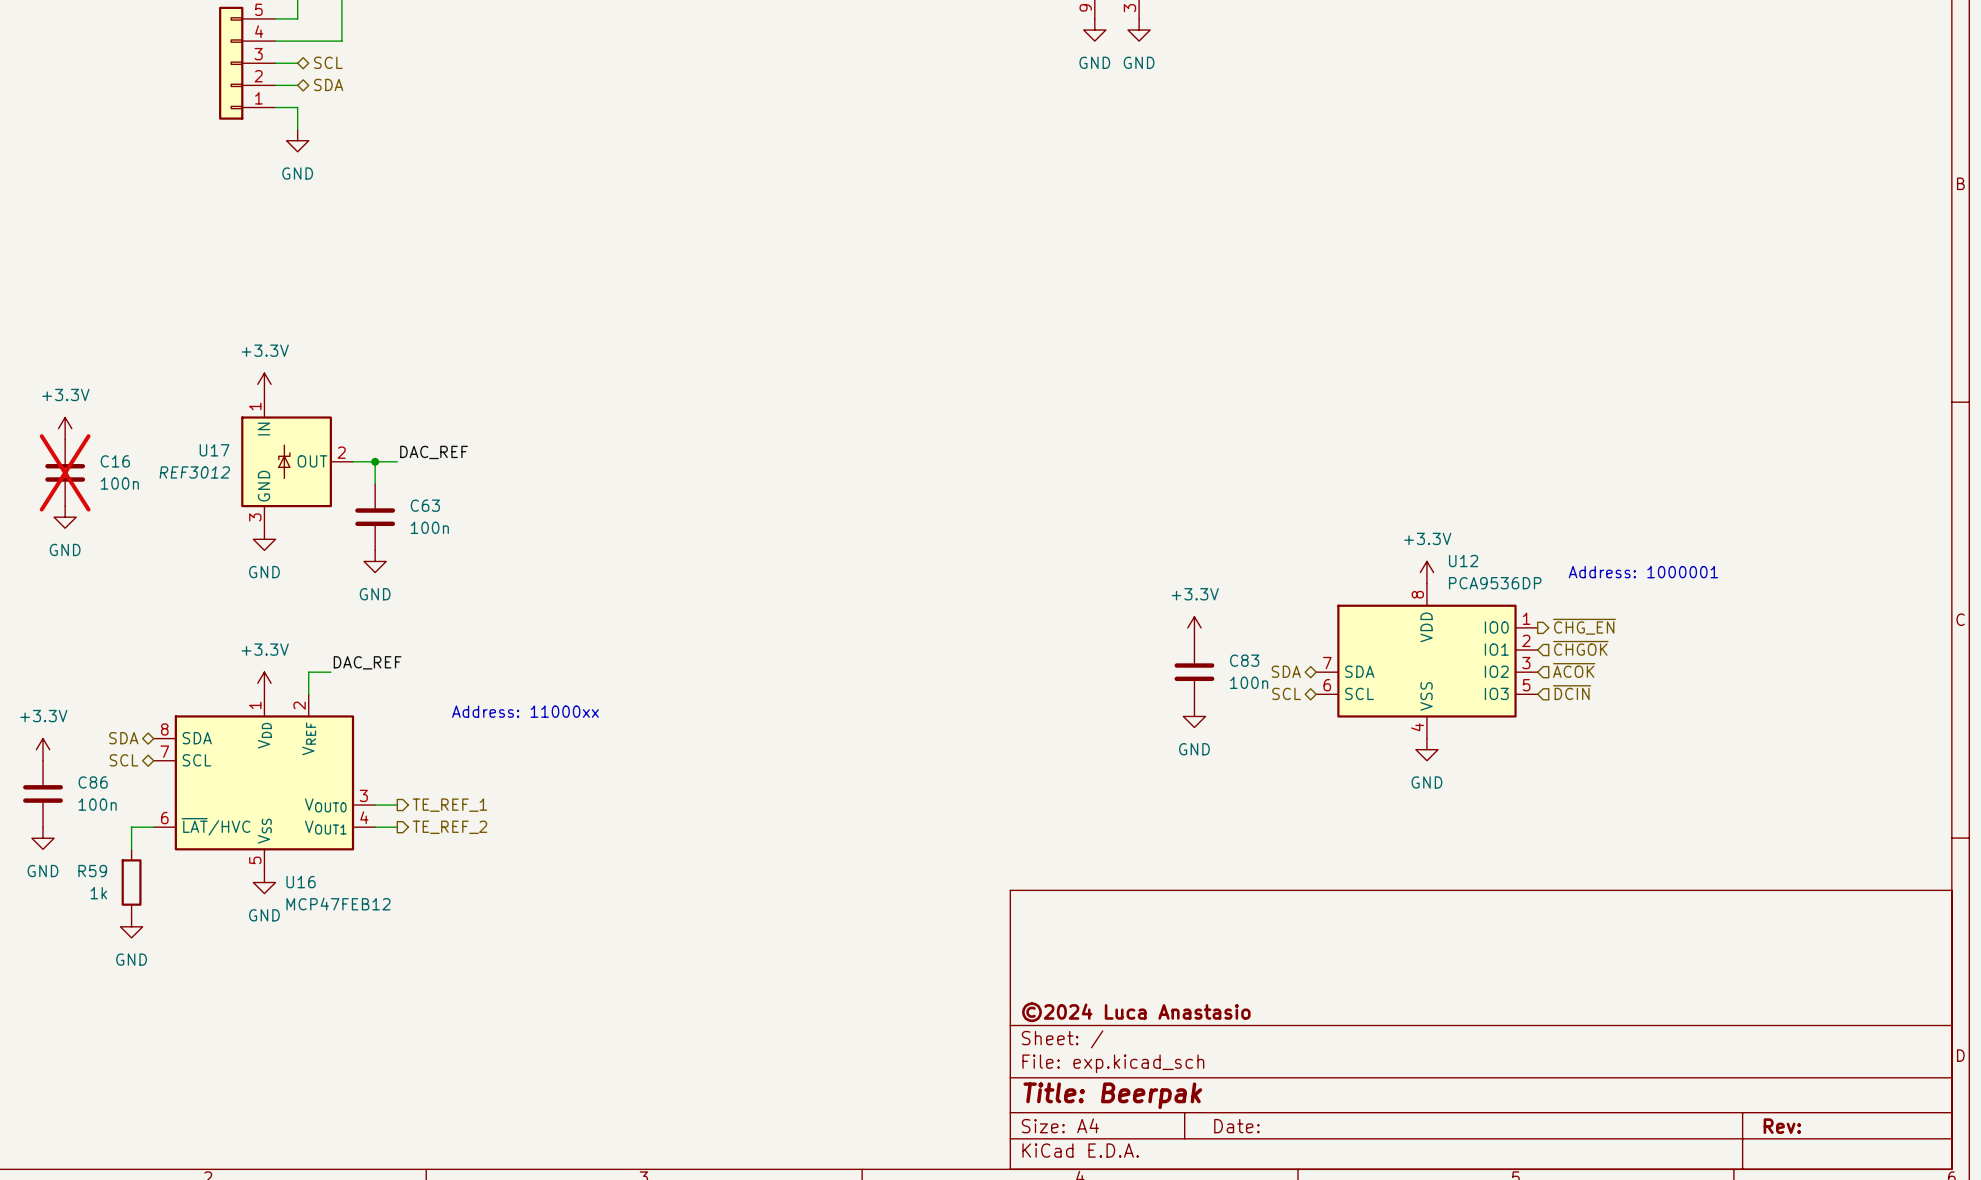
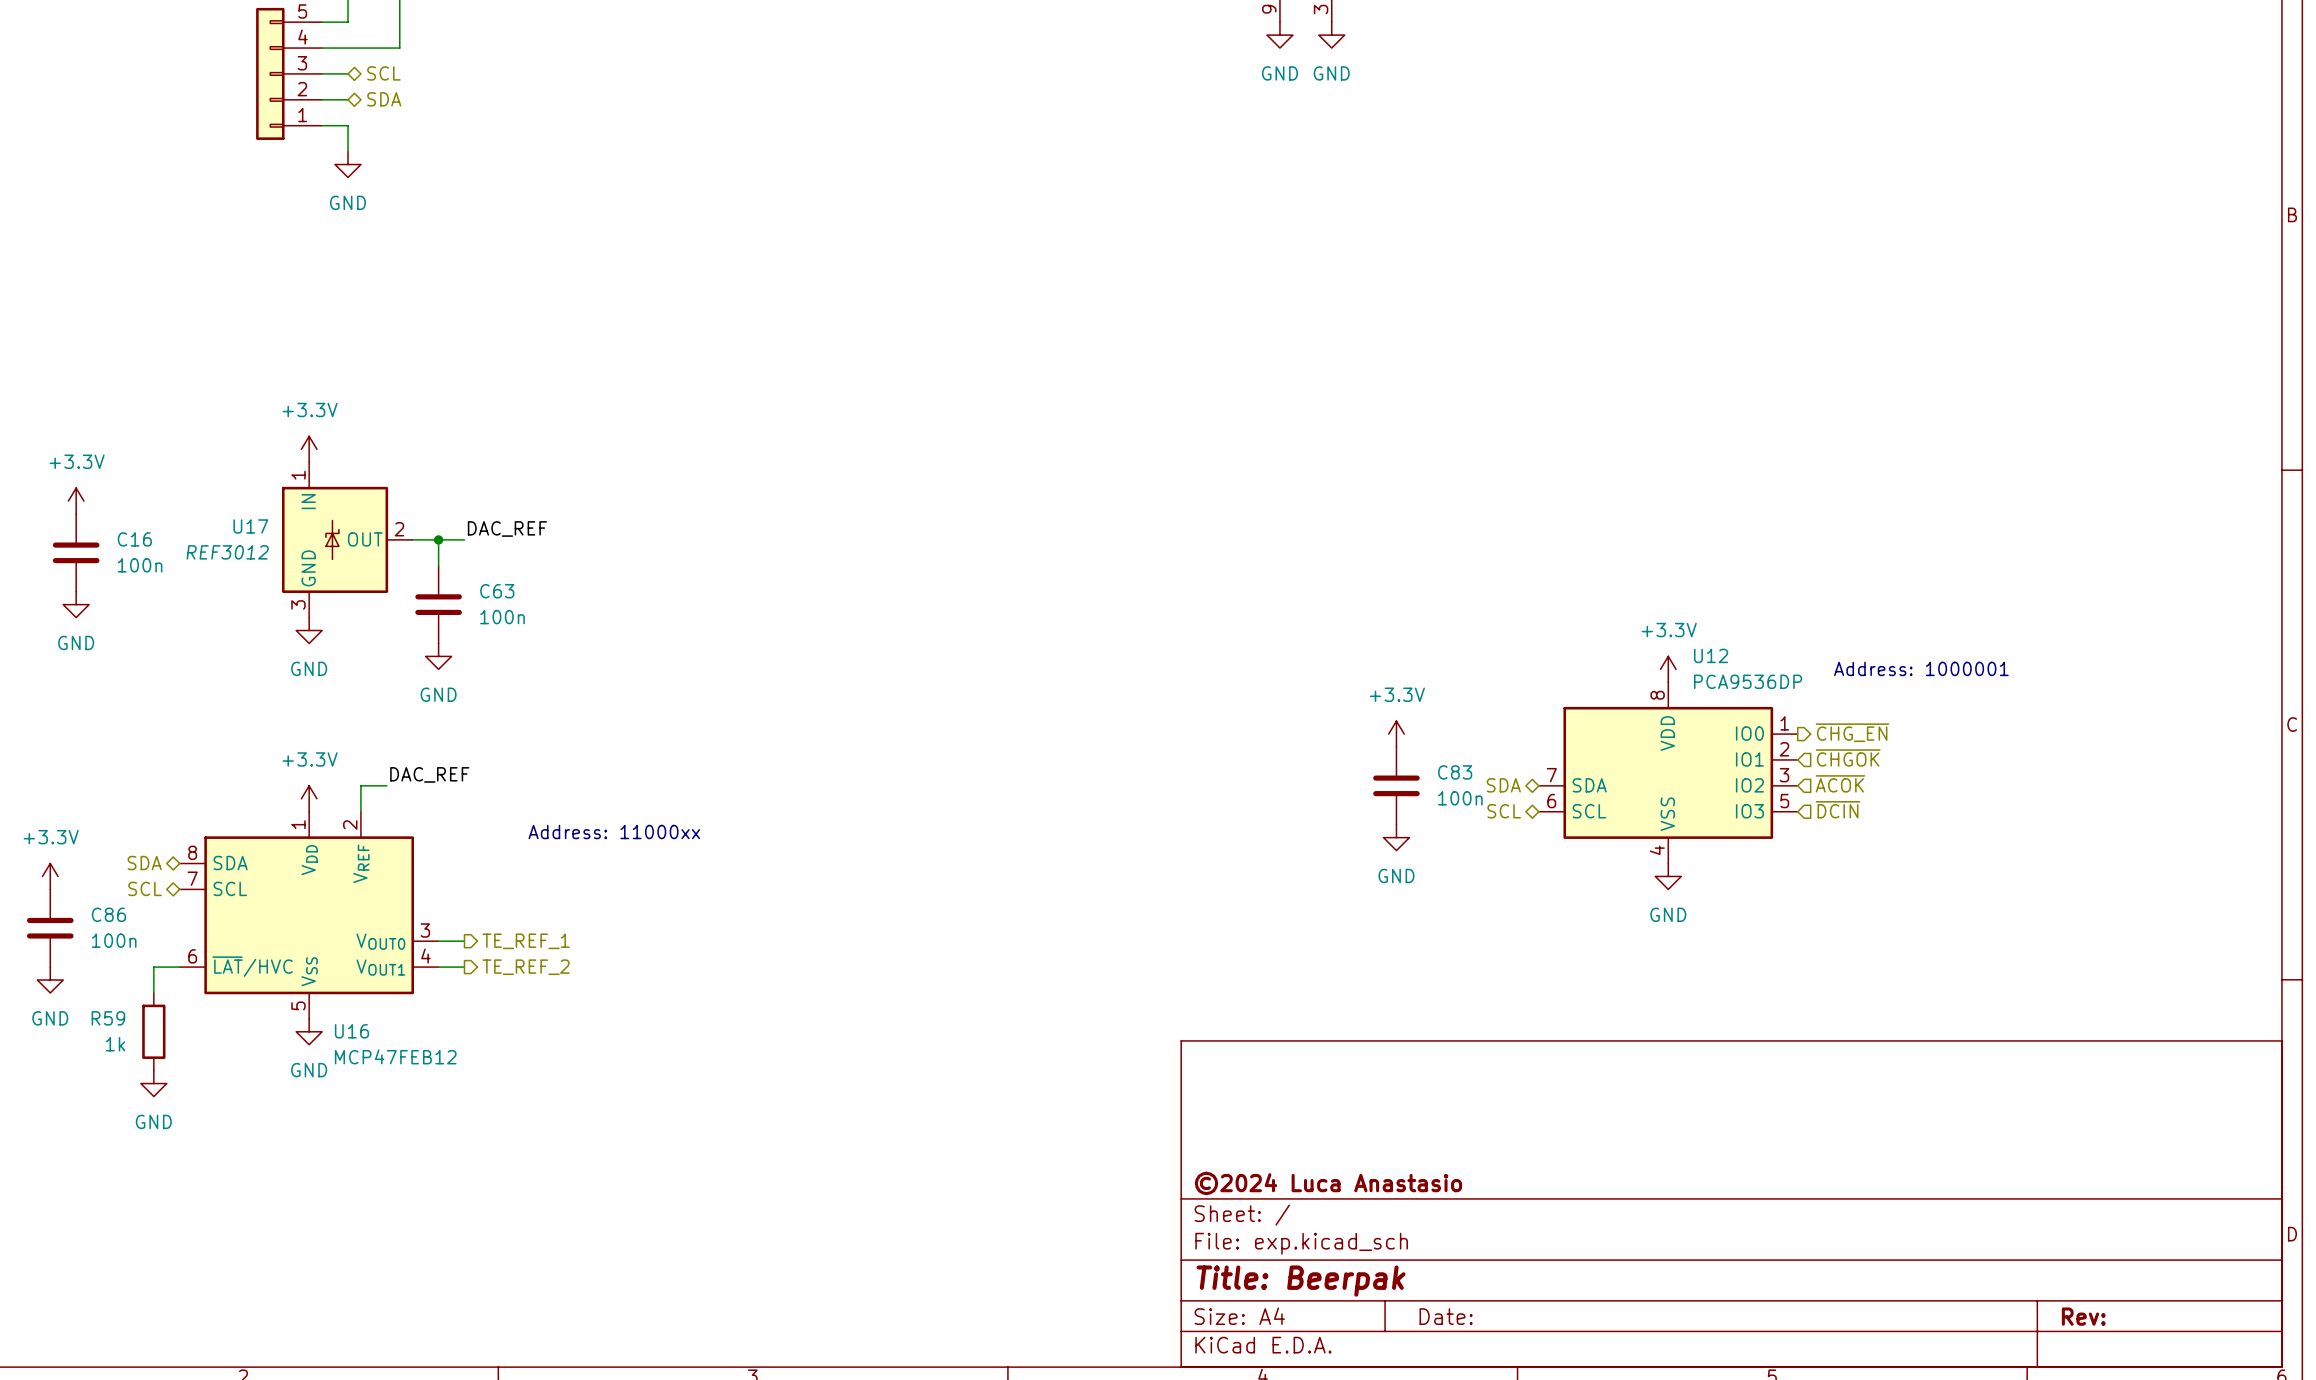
C16 do-not-place cross: (65, 472) -> none

